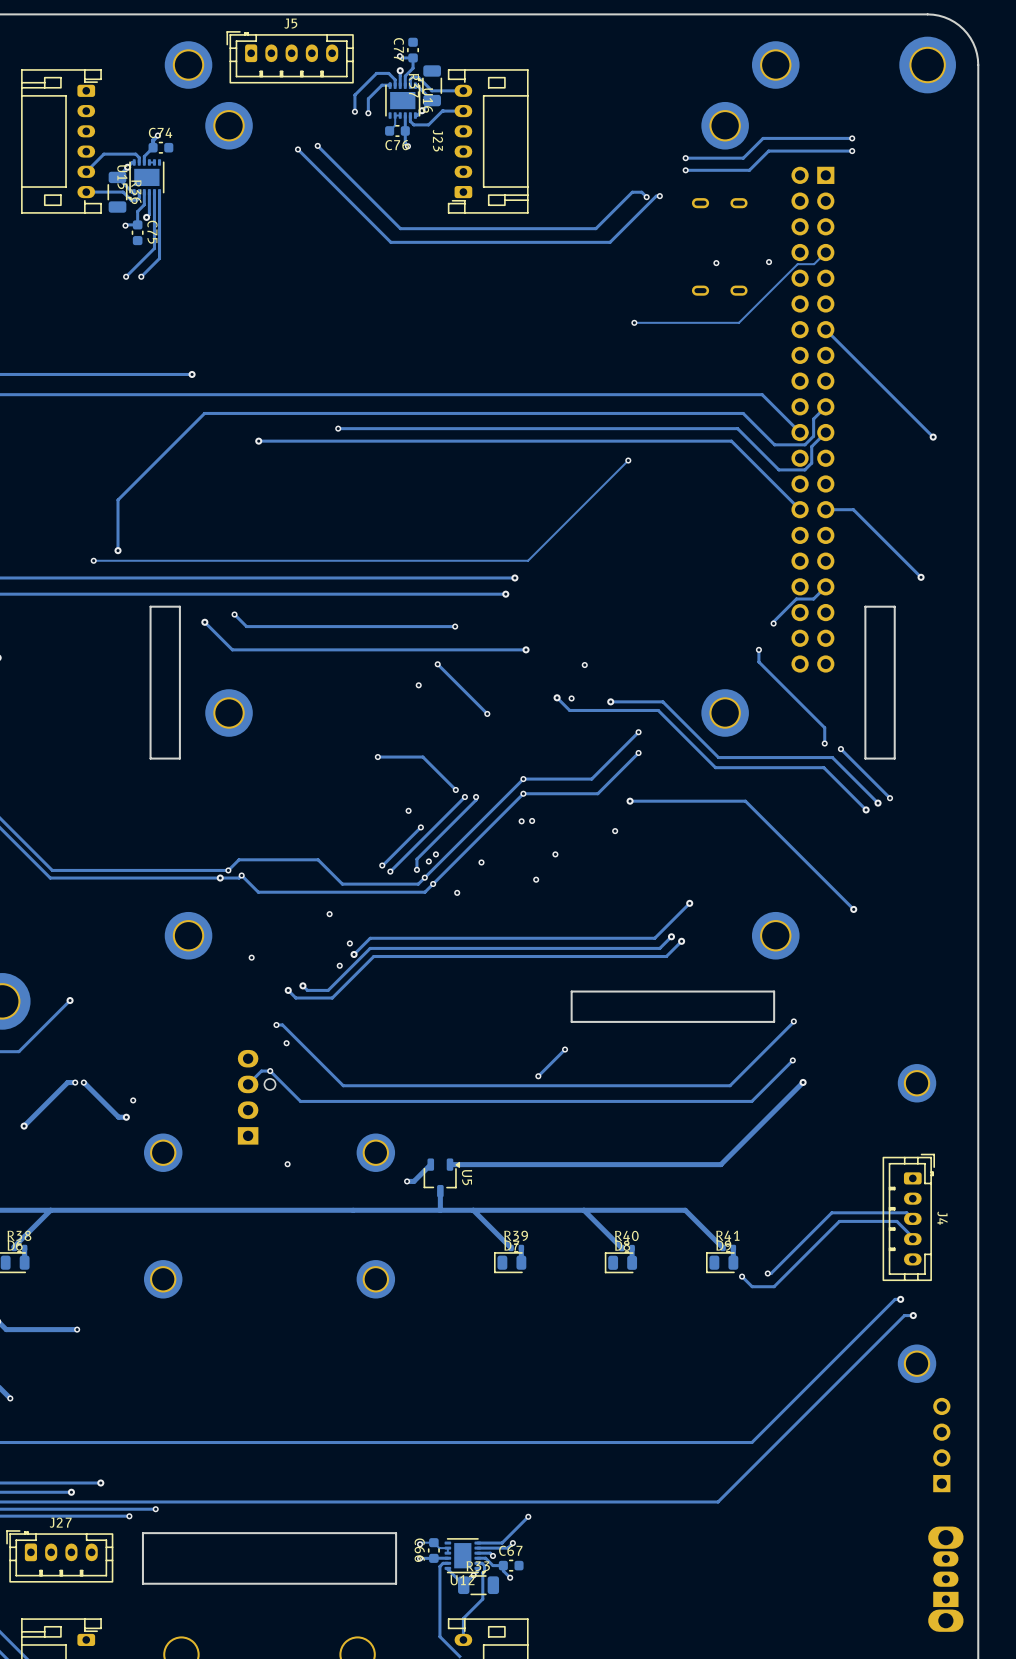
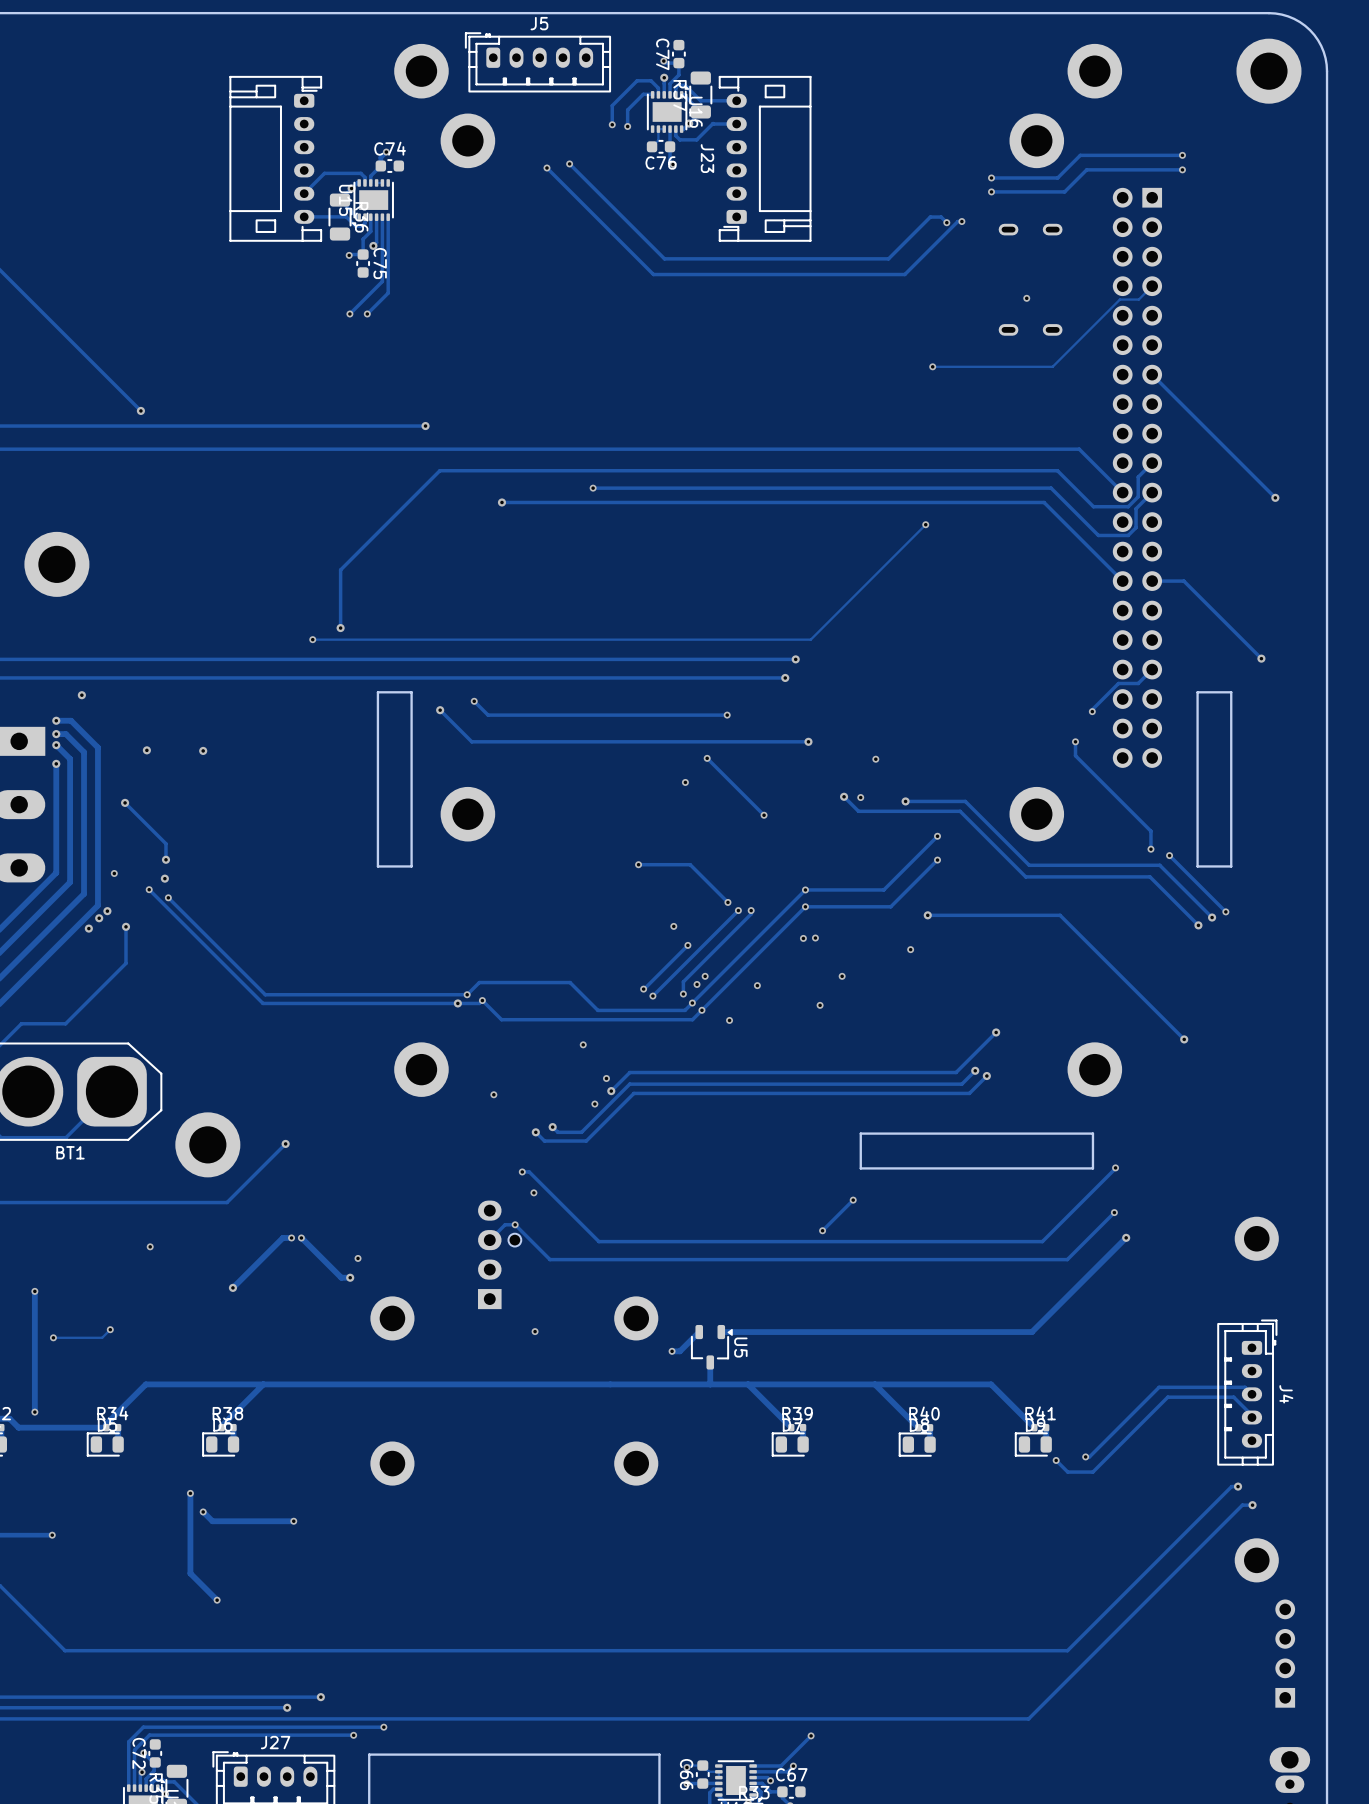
via: (769, 262) -> none

